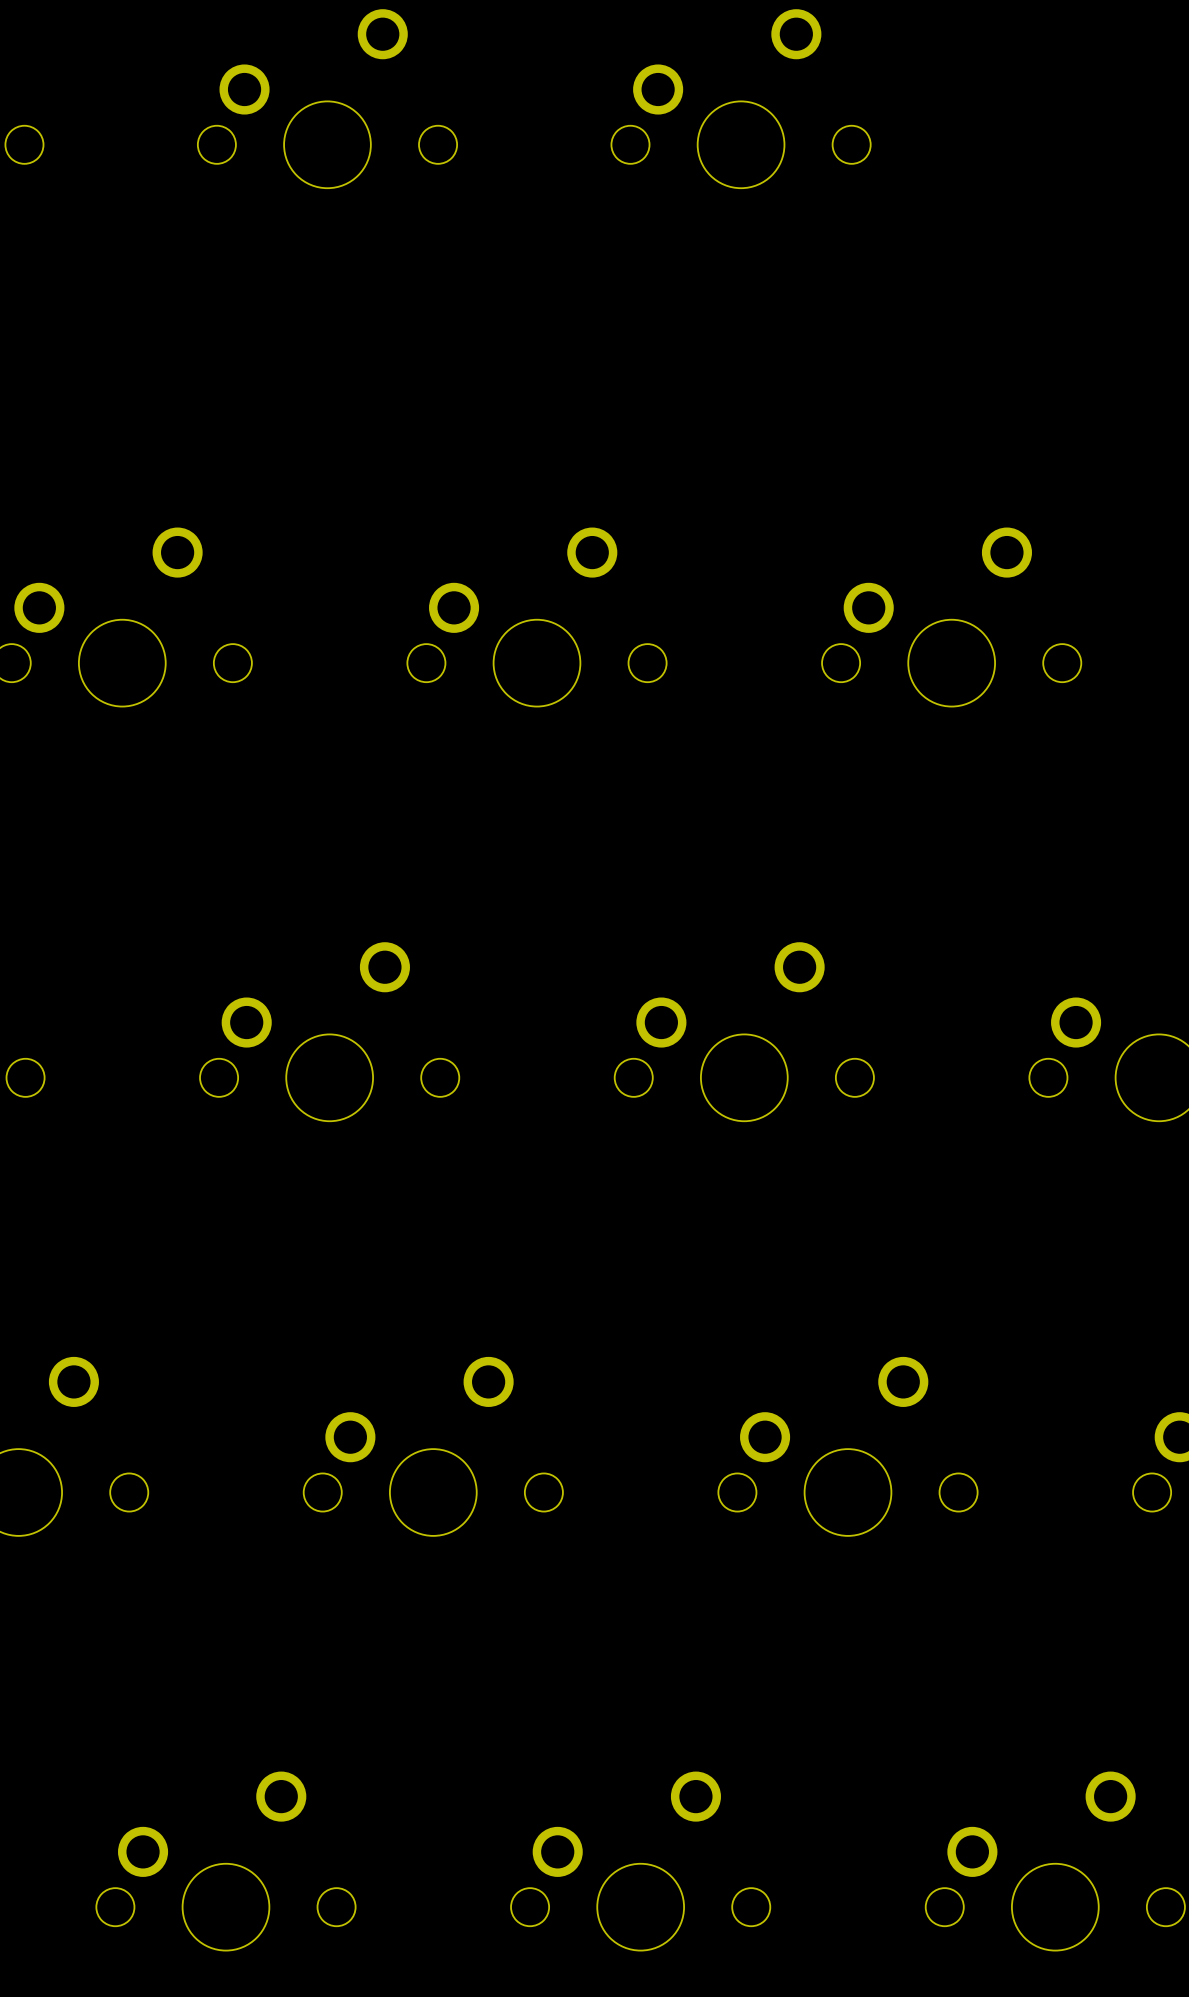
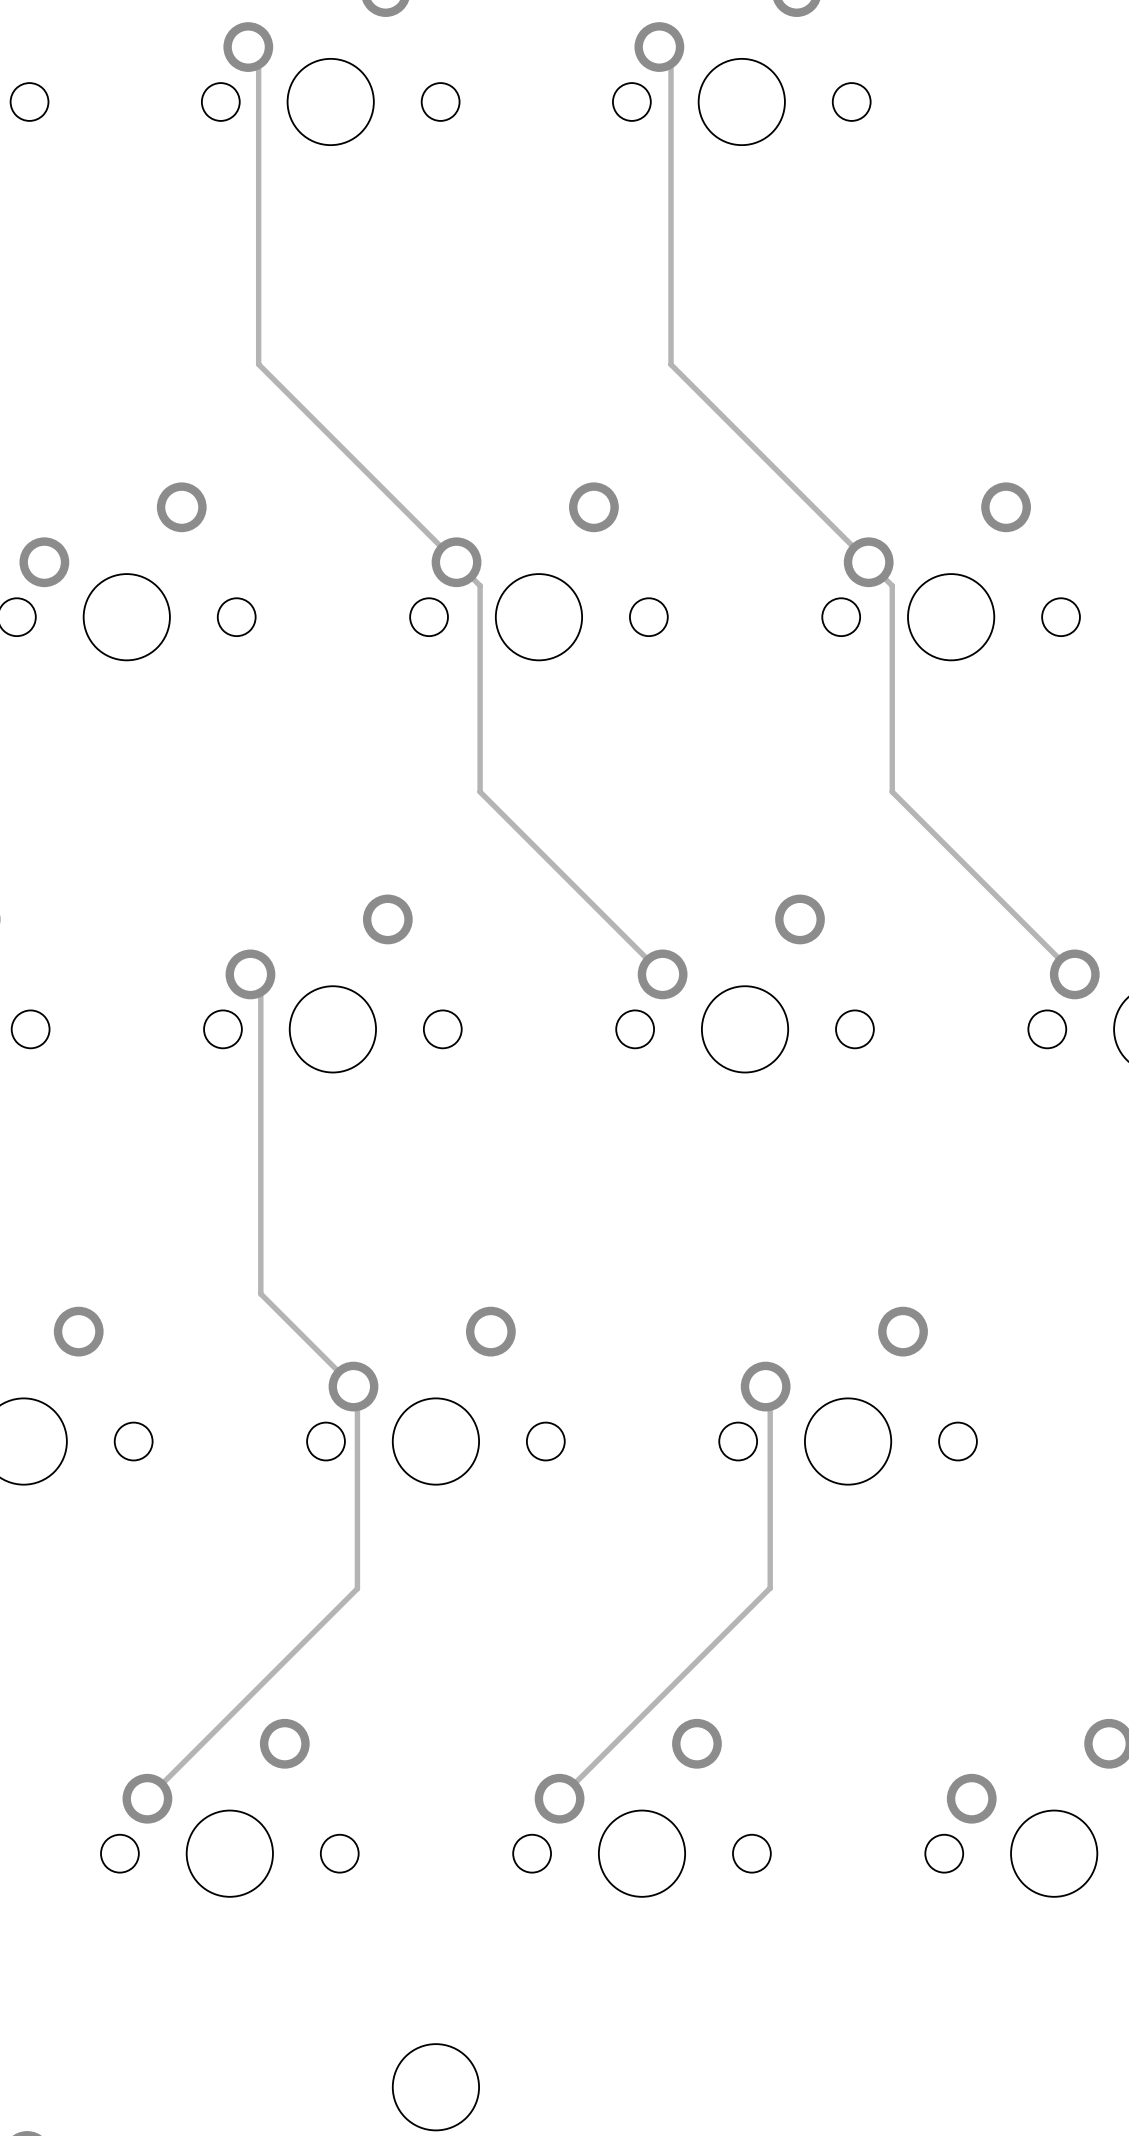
track: none -> (248, 47) (258, 57) (258, 364) (480, 585) (480, 791) (662, 974)
track: none -> (659, 47) (671, 58) (671, 364) (892, 585) (892, 791) (1074, 974)
track: none -> (250, 974) (260, 984) (260, 1293) (357, 1390) (357, 1588) (147, 1798)
track: none -> (765, 1386) (770, 1391) (770, 1588) (559, 1798)

